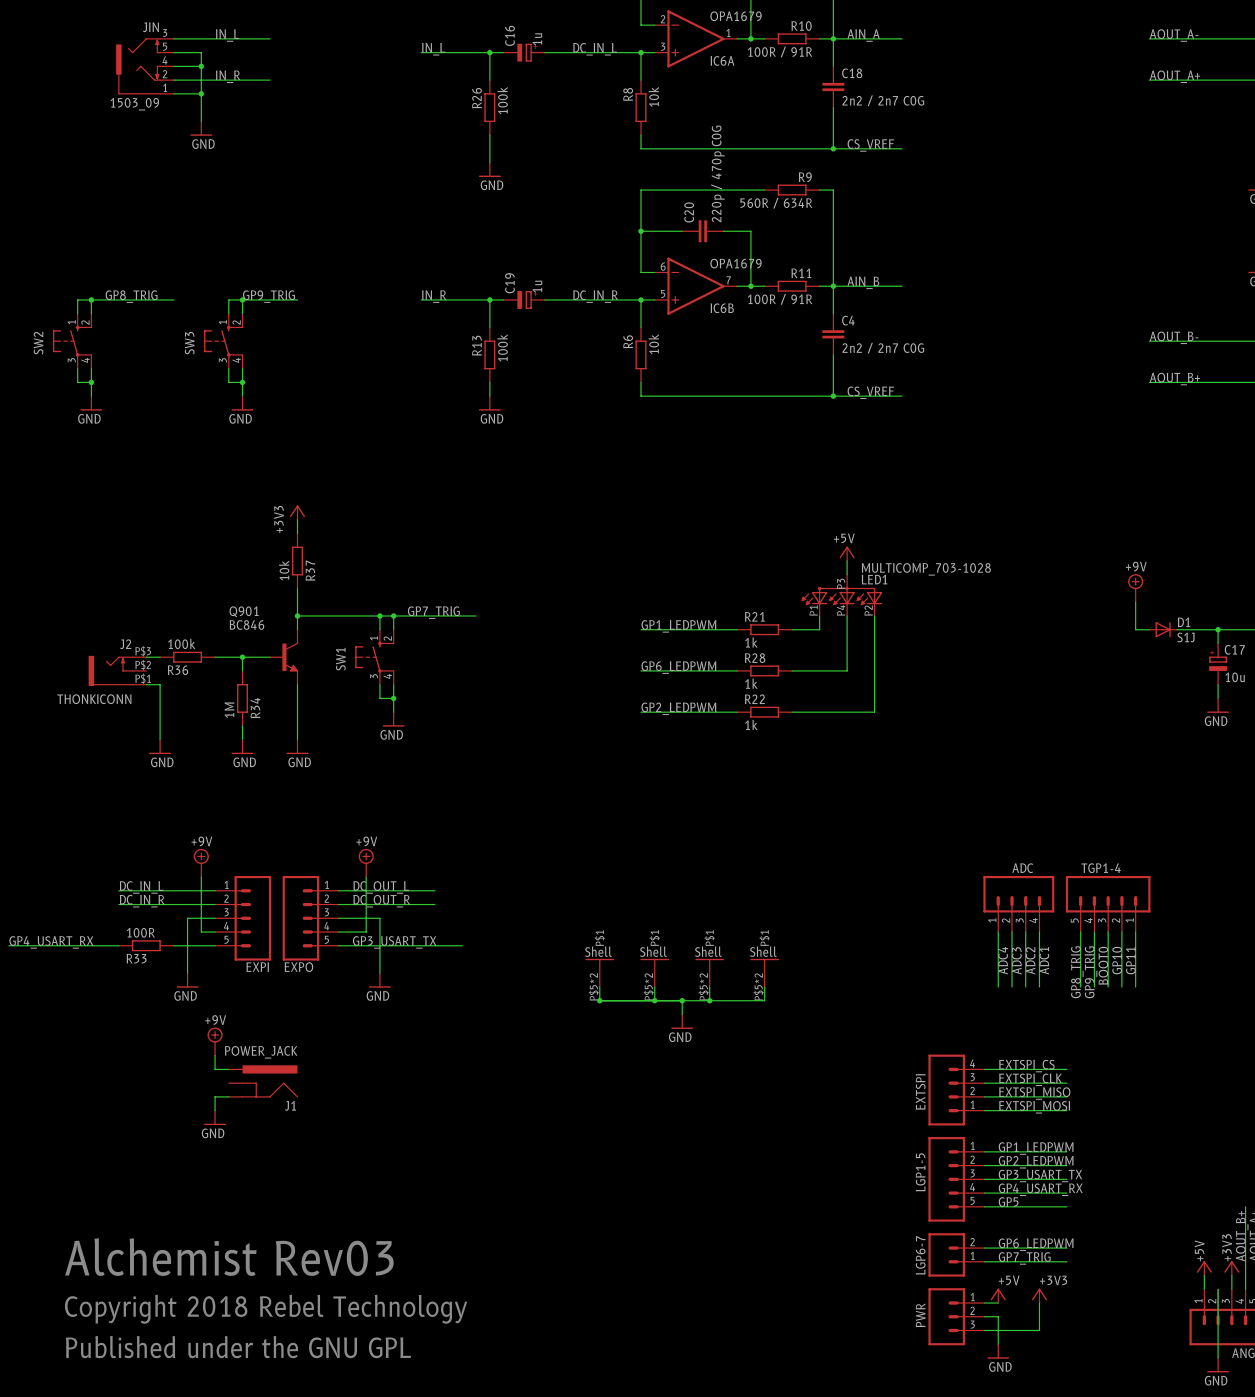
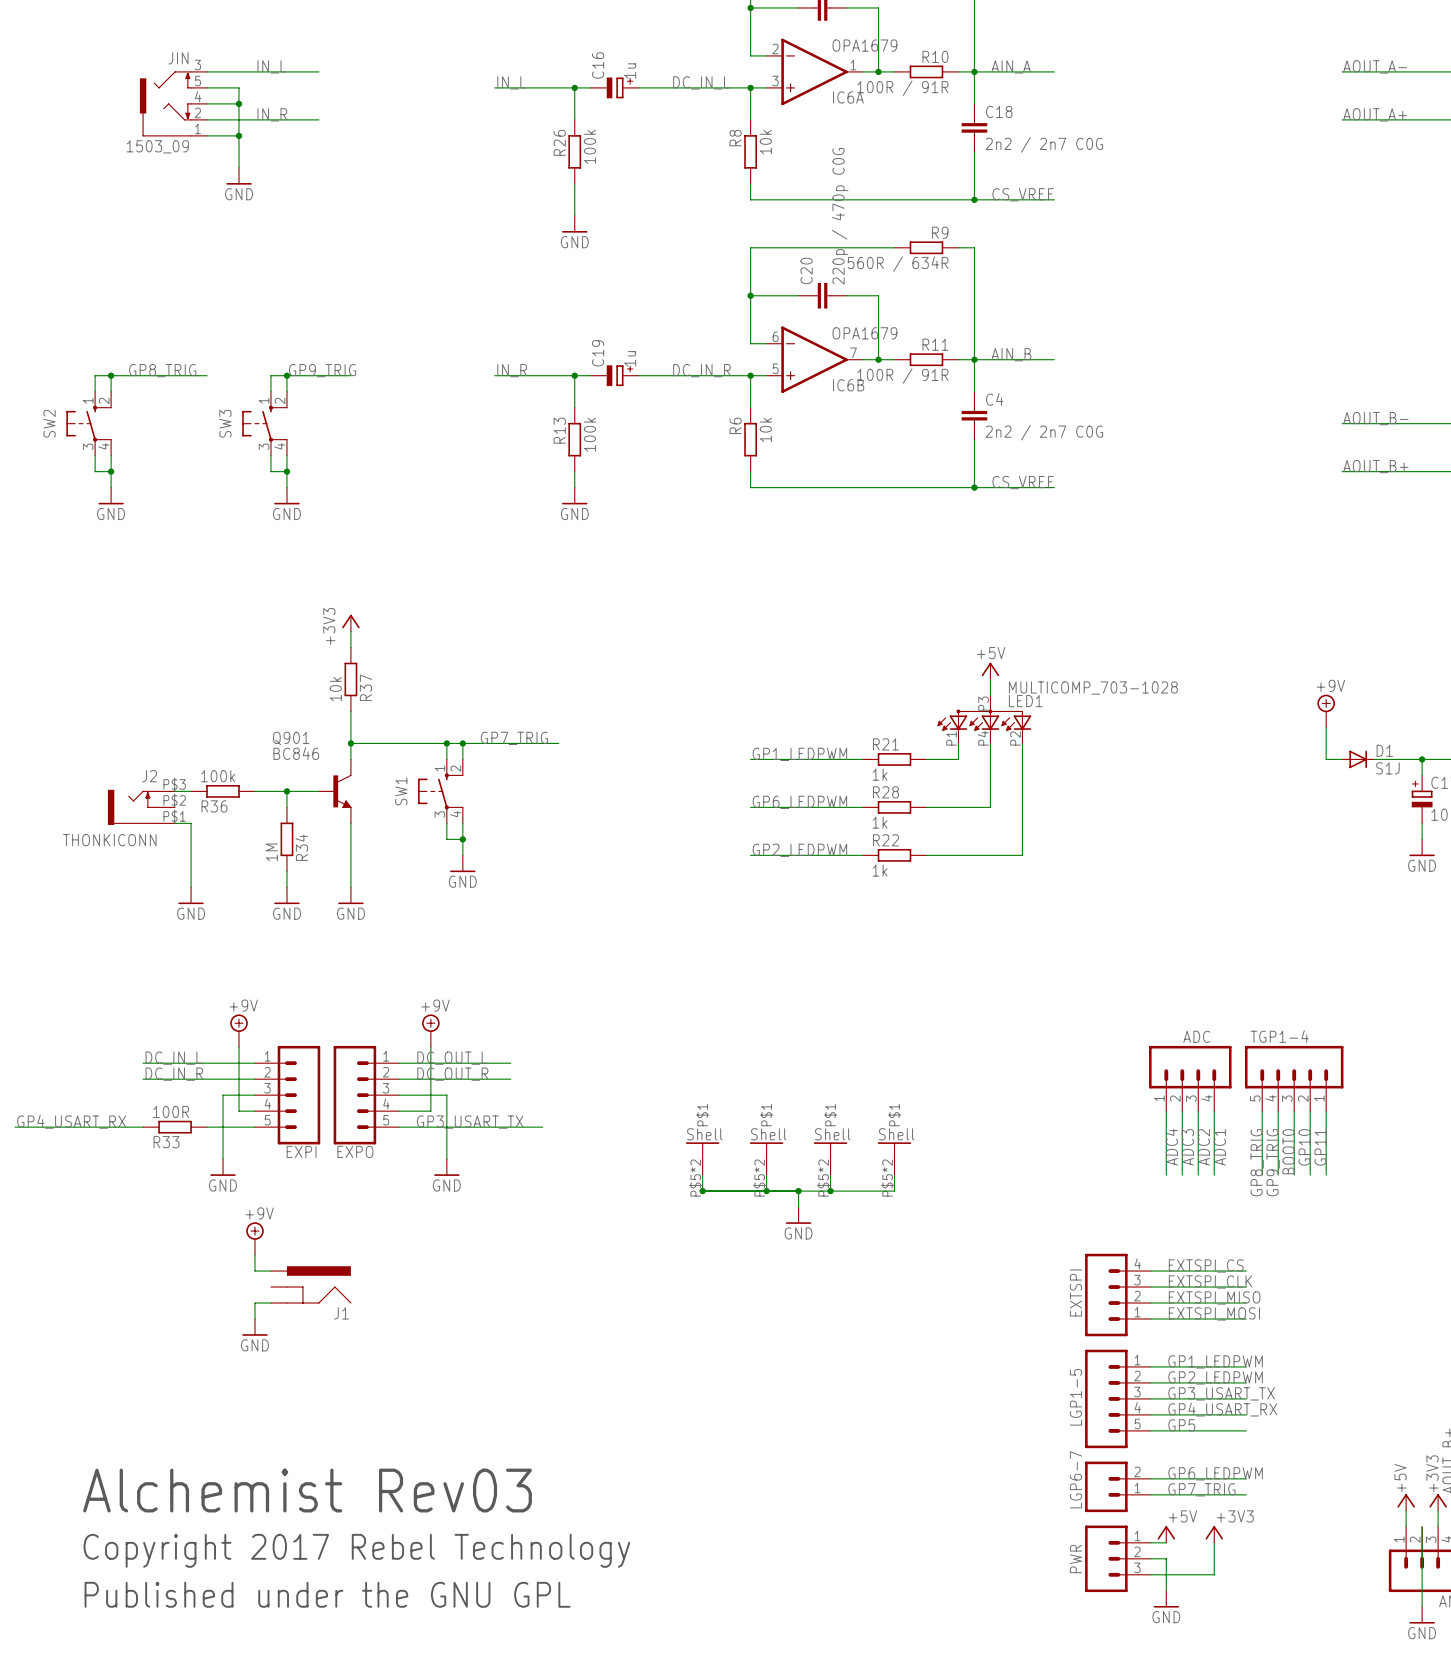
J1 value: POWER_JACK (261, 1052) -> none
text: Copyright 2018 Rebel Technology (266, 1309) -> Copyright 2017 Rebel Technology (356, 1550)

